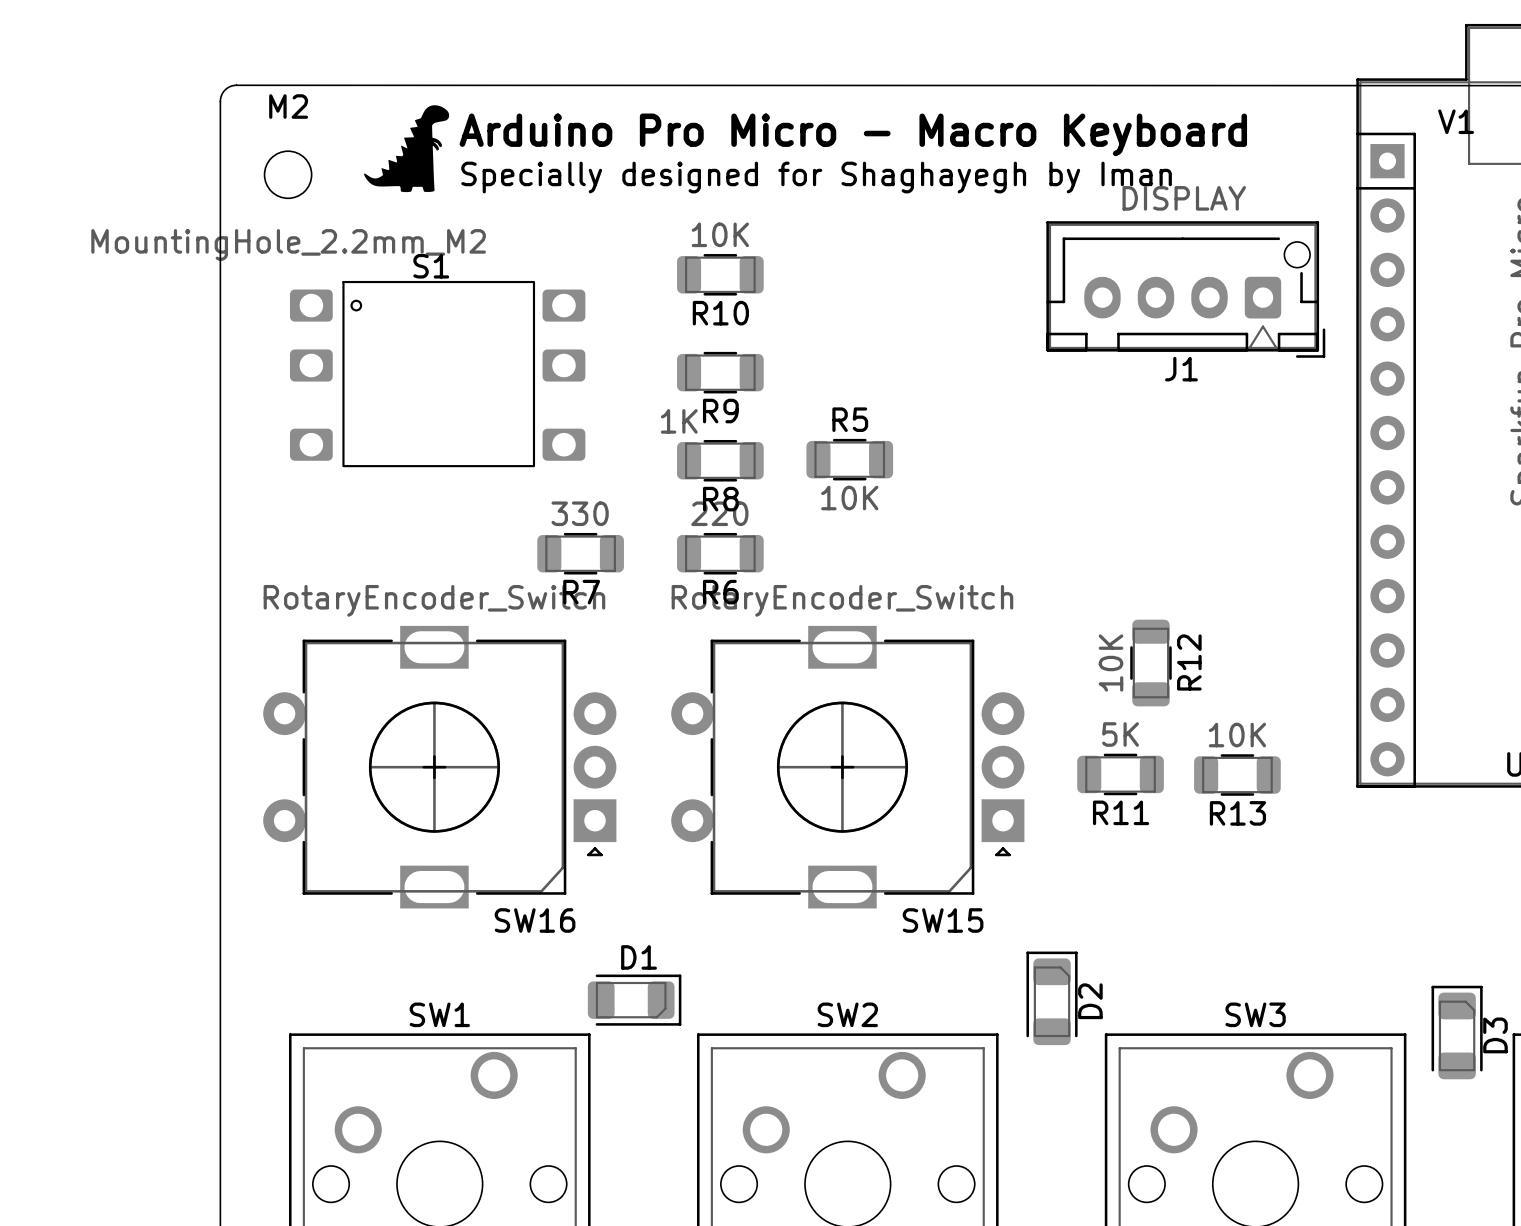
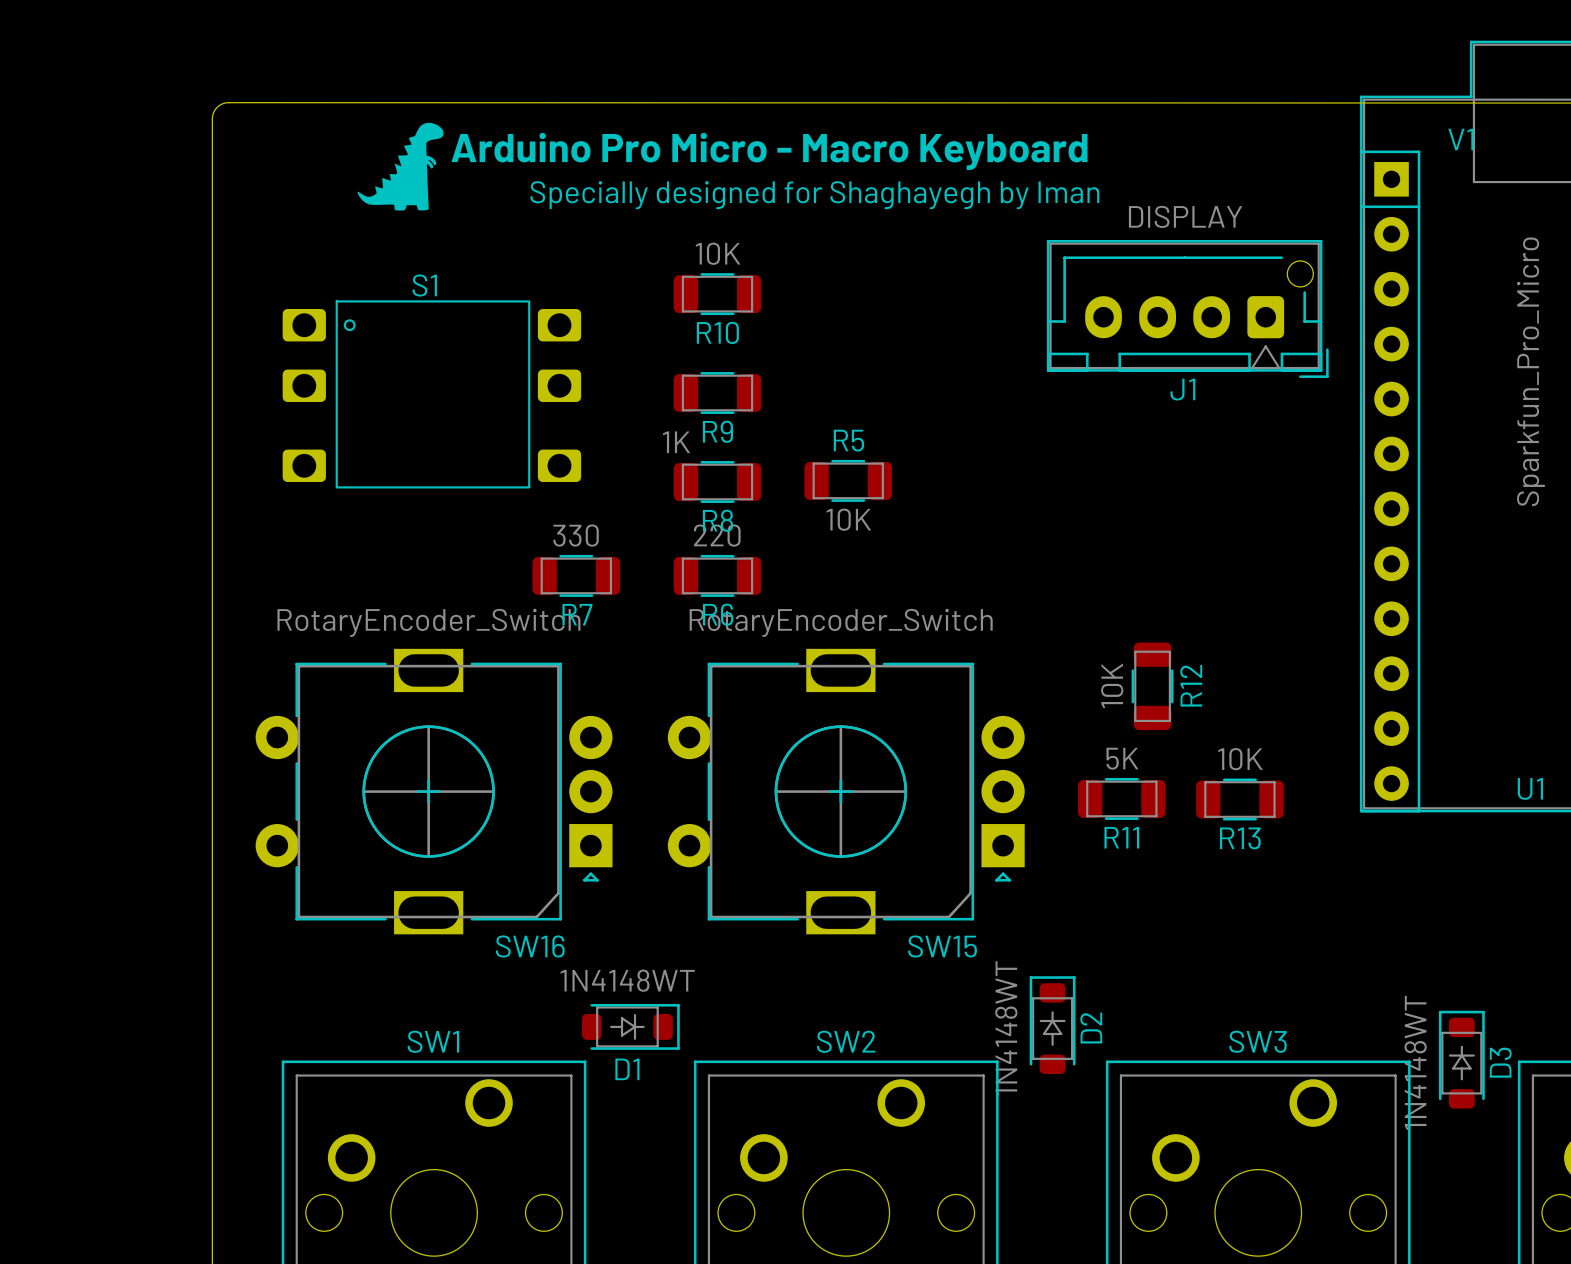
M2: MountingHole_2.2mm_M2 (288, 174) -> none
D2 footprint: [1026, 951, 1078, 1046] -> [1029, 976, 1076, 1074]
D1 value: none -> 1N4148WT (627, 980)
D1 name position: D1 (639, 957) -> D1 (627, 1069)
D1 footprint: [587, 974, 682, 1026] -> [582, 1004, 680, 1050]
D3 footprint: [1431, 985, 1483, 1080] -> [1438, 1010, 1485, 1109]
D2 value: none -> 1N4148WT (1006, 1028)
D3 value: none -> 1N4148WT (1415, 1062)

